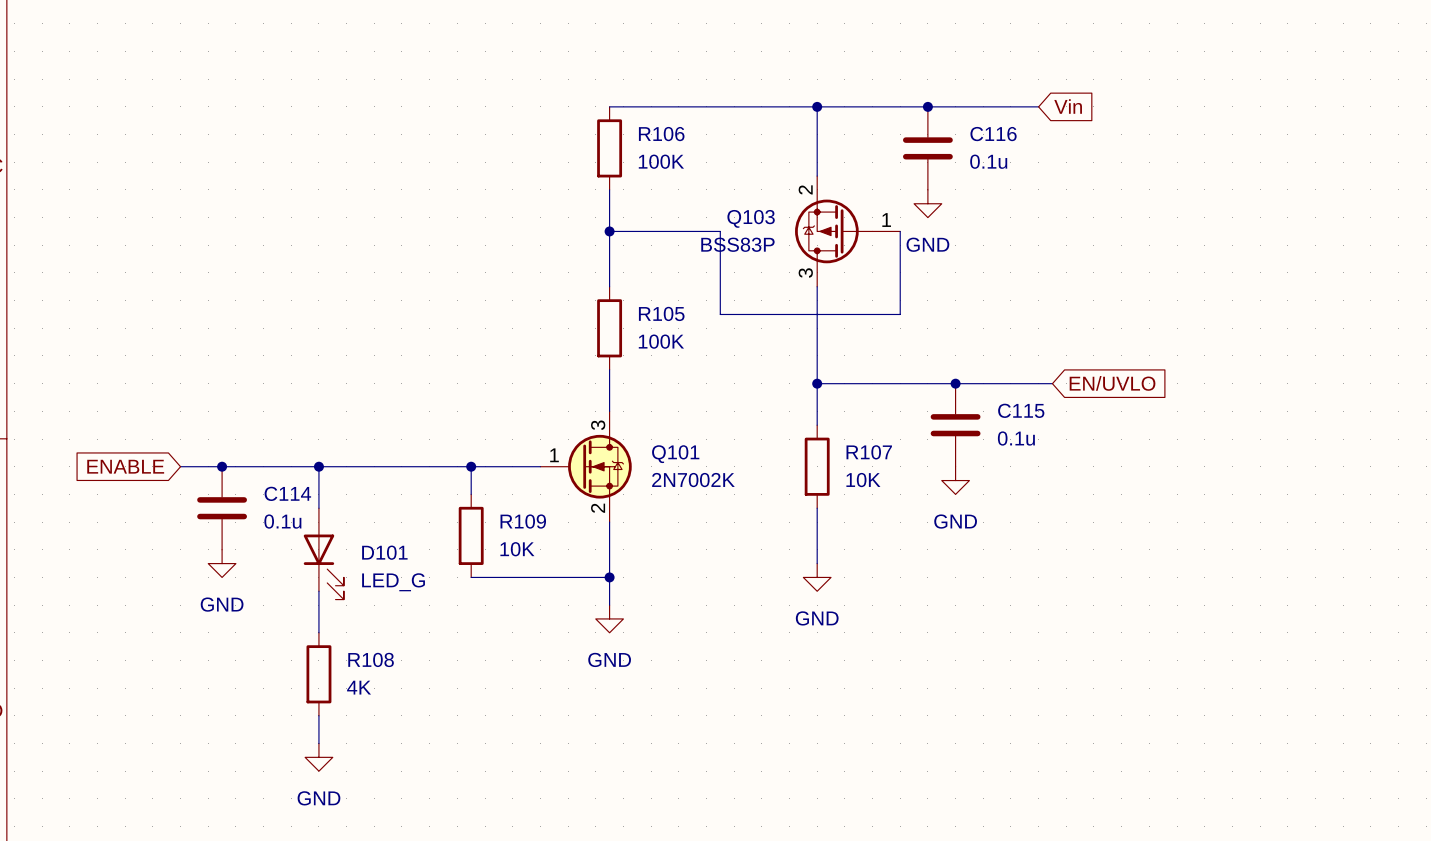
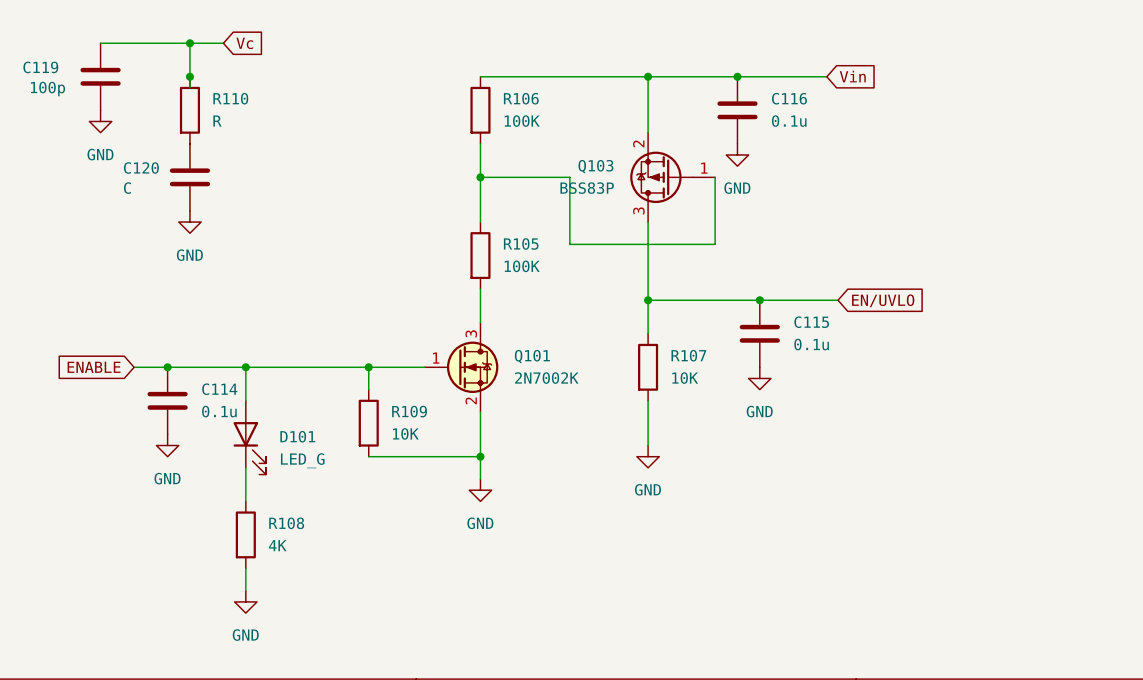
wire: none -> (100, 43) (223, 43)
wire: none -> (189, 43) (189, 87)
junction: none -> (189, 43)
global label: none -> Vc (244, 43)
C119: none -> 100p (100, 76)
junction: none -> (189, 76)
R110: none -> R (189, 110)
power symbol: none -> GND (100, 121)
C120: none -> C (189, 177)
power symbol: none -> GND (189, 222)

